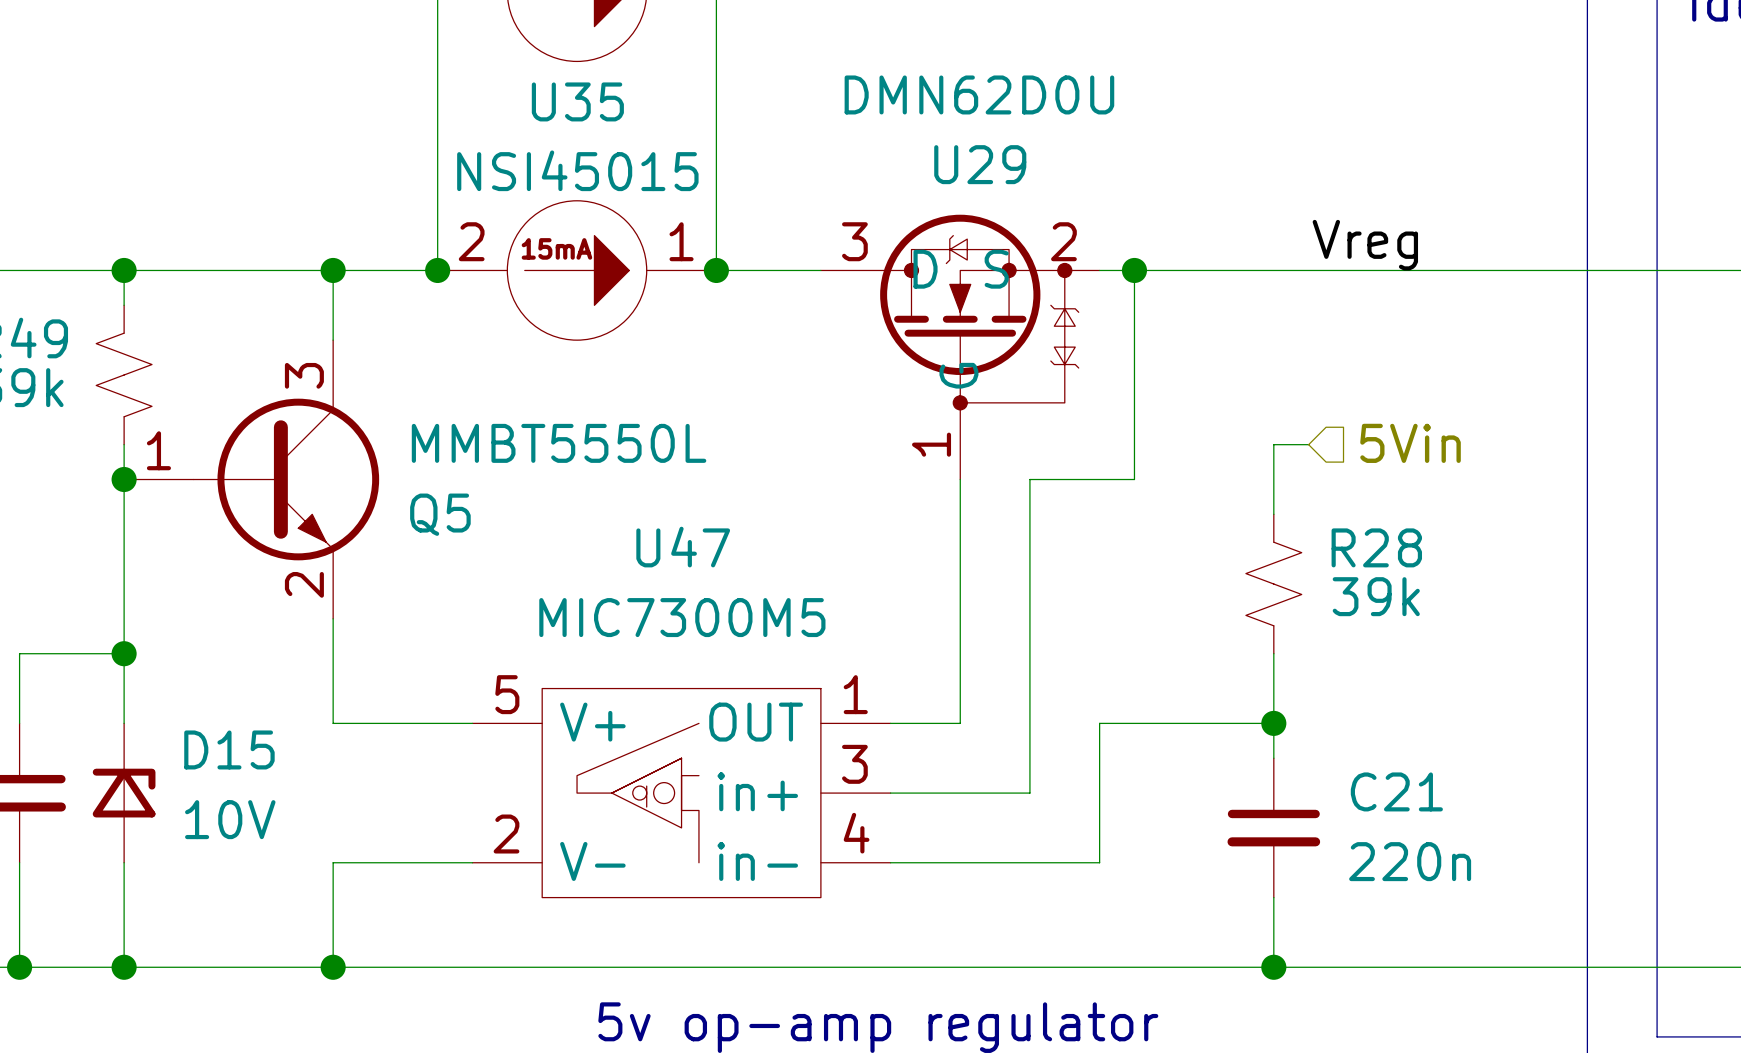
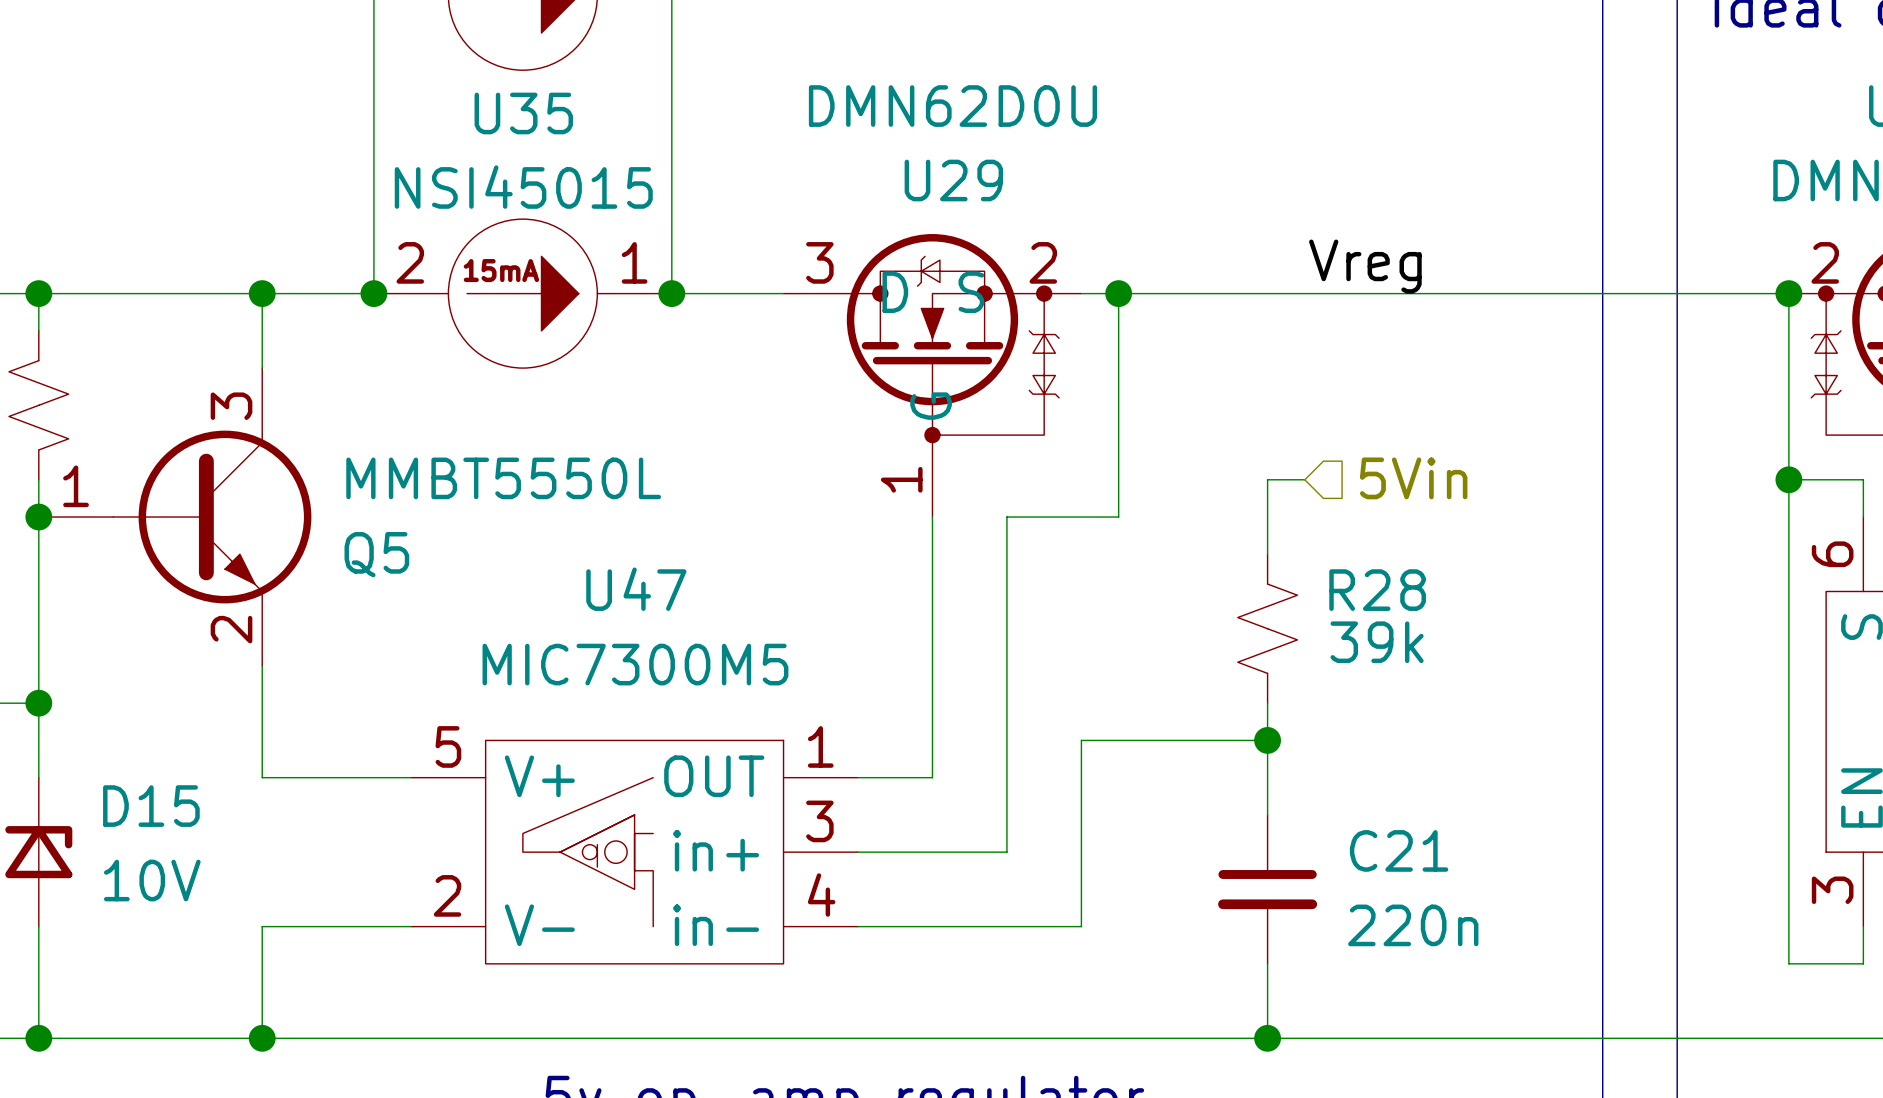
wire: (1099, 723) (1273, 723) -> (1081, 777) (1081, 740) (1267, 740)
junction position: (1273, 723) -> (1267, 740)

